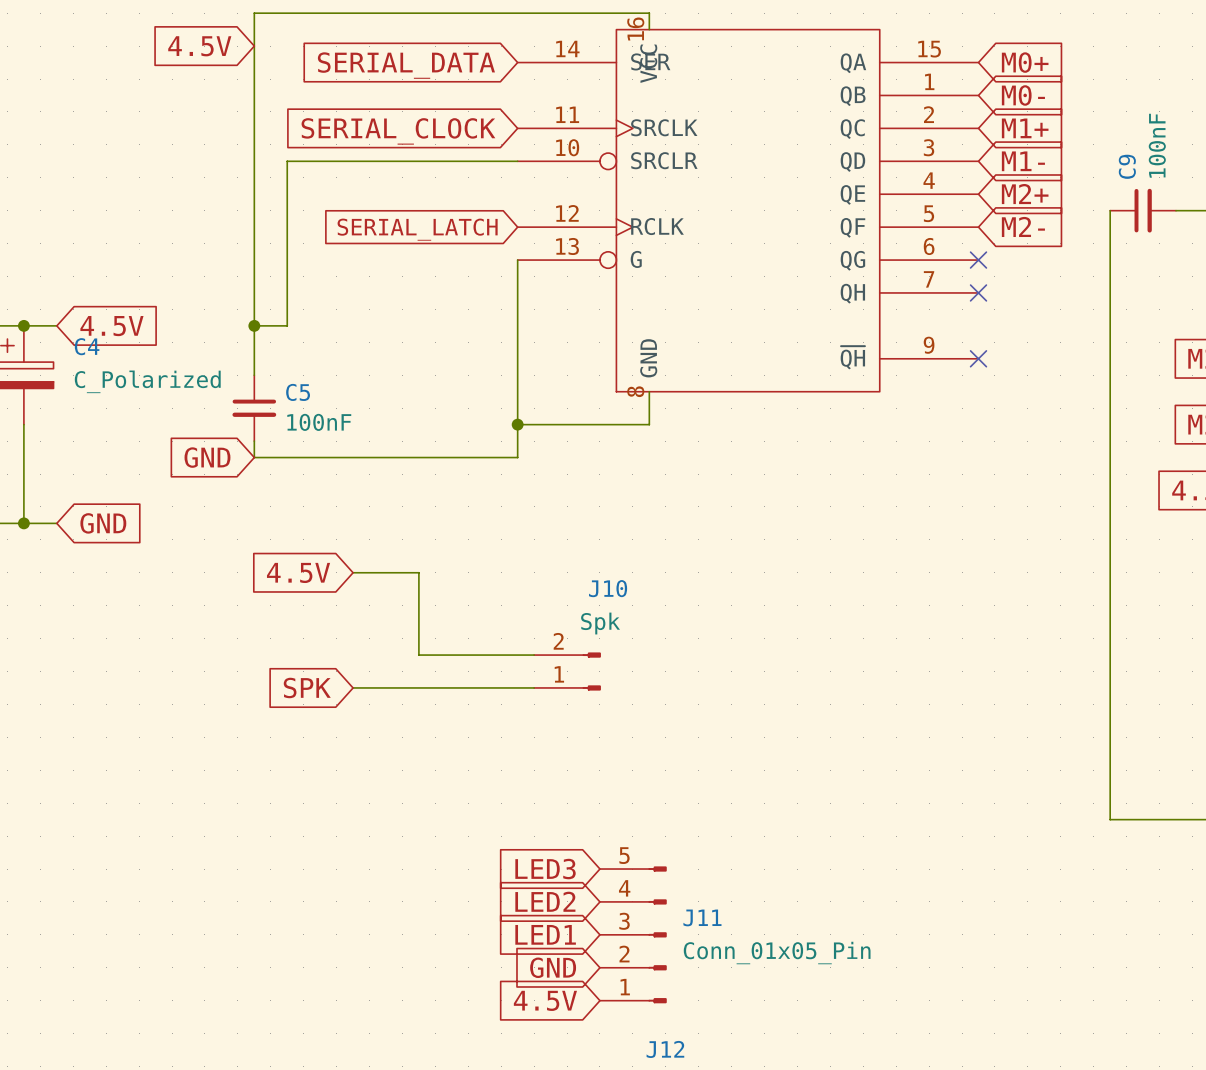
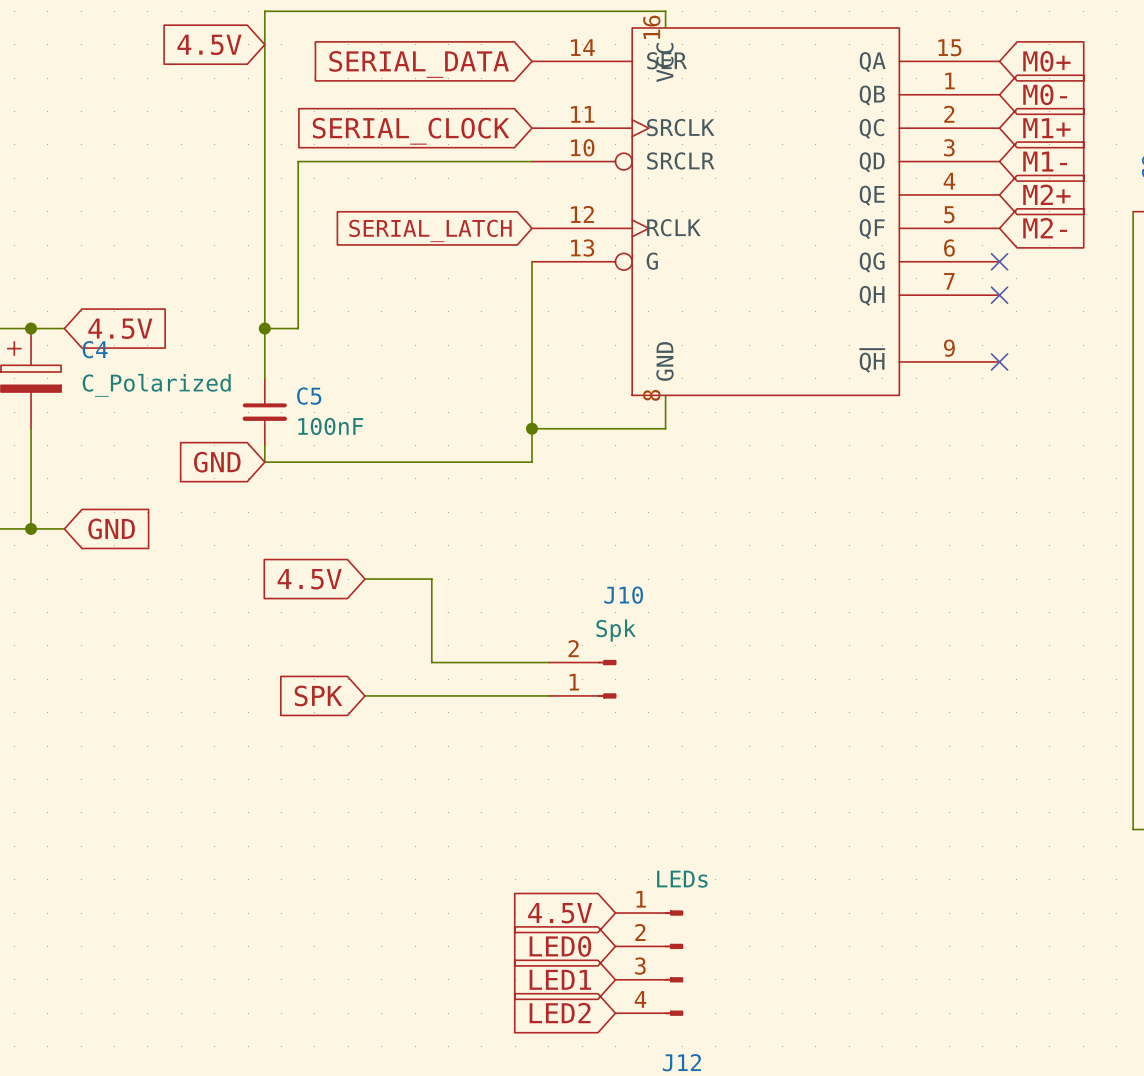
global label: LED3 (545, 869) -> none
global label: LED2 (545, 901) -> 4.5V (560, 913)
global label: LED1 (545, 934) -> LED0 (560, 946)
J11: Conn_01x05_Pin (633, 934) -> none
part: none -> LEDs (649, 963)
global label: GND (553, 967) -> LED1 (560, 979)
global label: 4.5V (545, 1000) -> LED2 (560, 1013)

